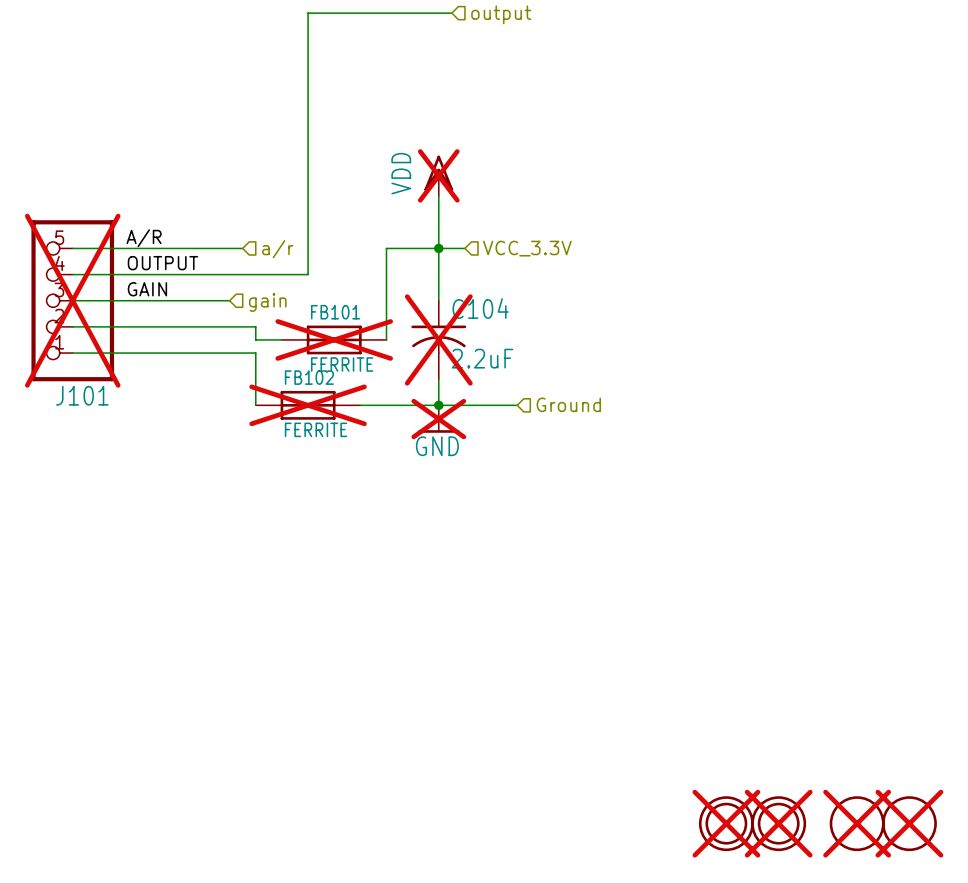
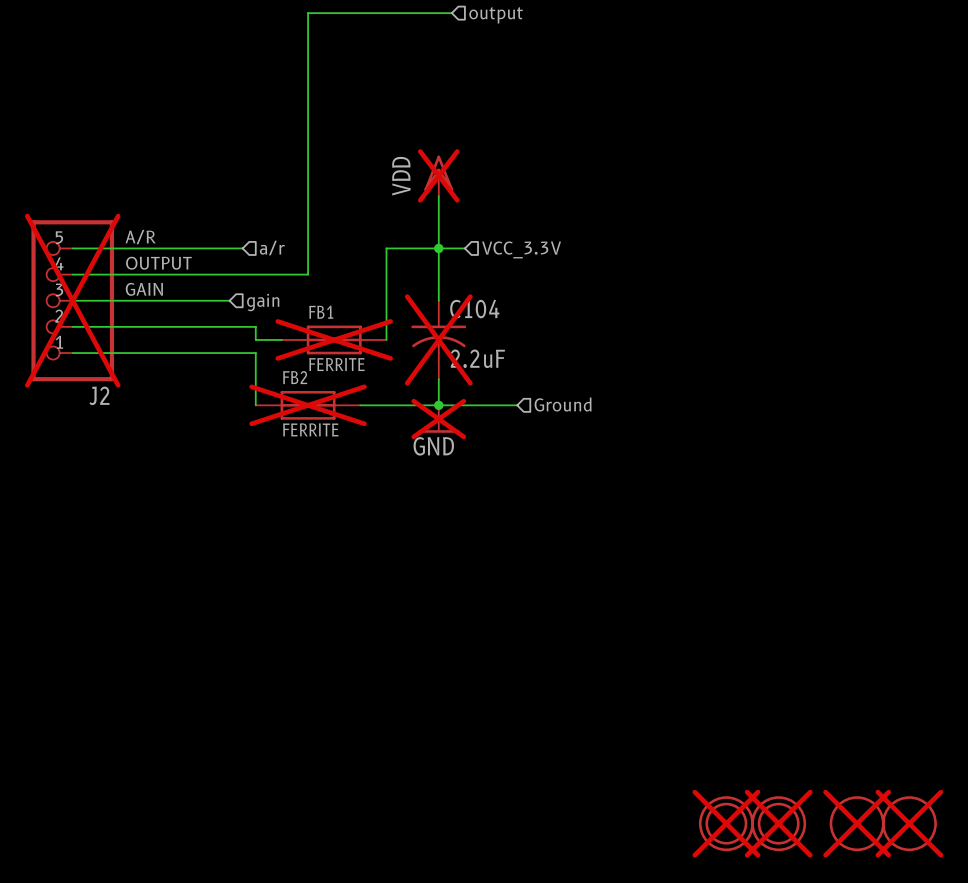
FB101 name: FB101 (335, 312) -> FB1 (321, 312)
FB102 name: FB102 (309, 377) -> FB2 (295, 377)
J101 name: J101 (82, 395) -> J2 (99, 395)

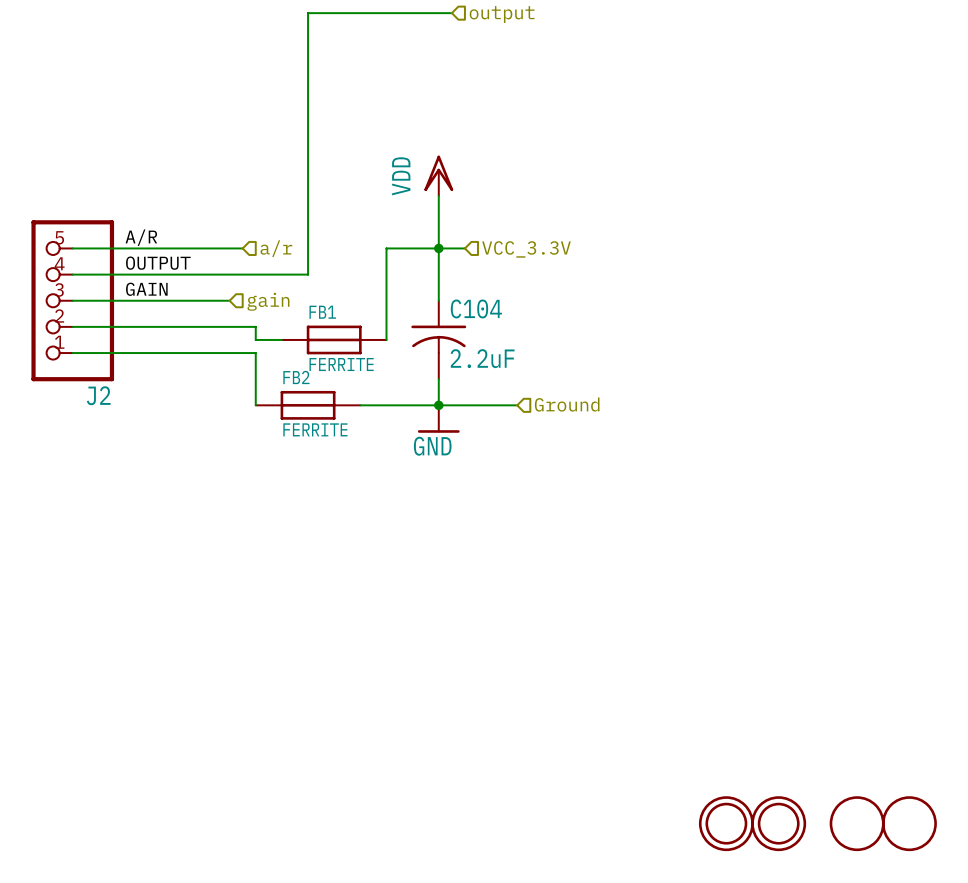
power symbol do-not-place cross: (438, 175) -> none
J2 do-not-place cross: (72, 300) -> none
FB1 do-not-place cross: (334, 339) -> none
C104 do-not-place cross: (438, 339) -> none
FB2 do-not-place cross: (308, 405) -> none
power symbol do-not-place cross: (438, 419) -> none
part do-not-place cross: (726, 823) -> none
part do-not-place cross: (778, 823) -> none
part do-not-place cross: (857, 823) -> none
part do-not-place cross: (909, 823) -> none

